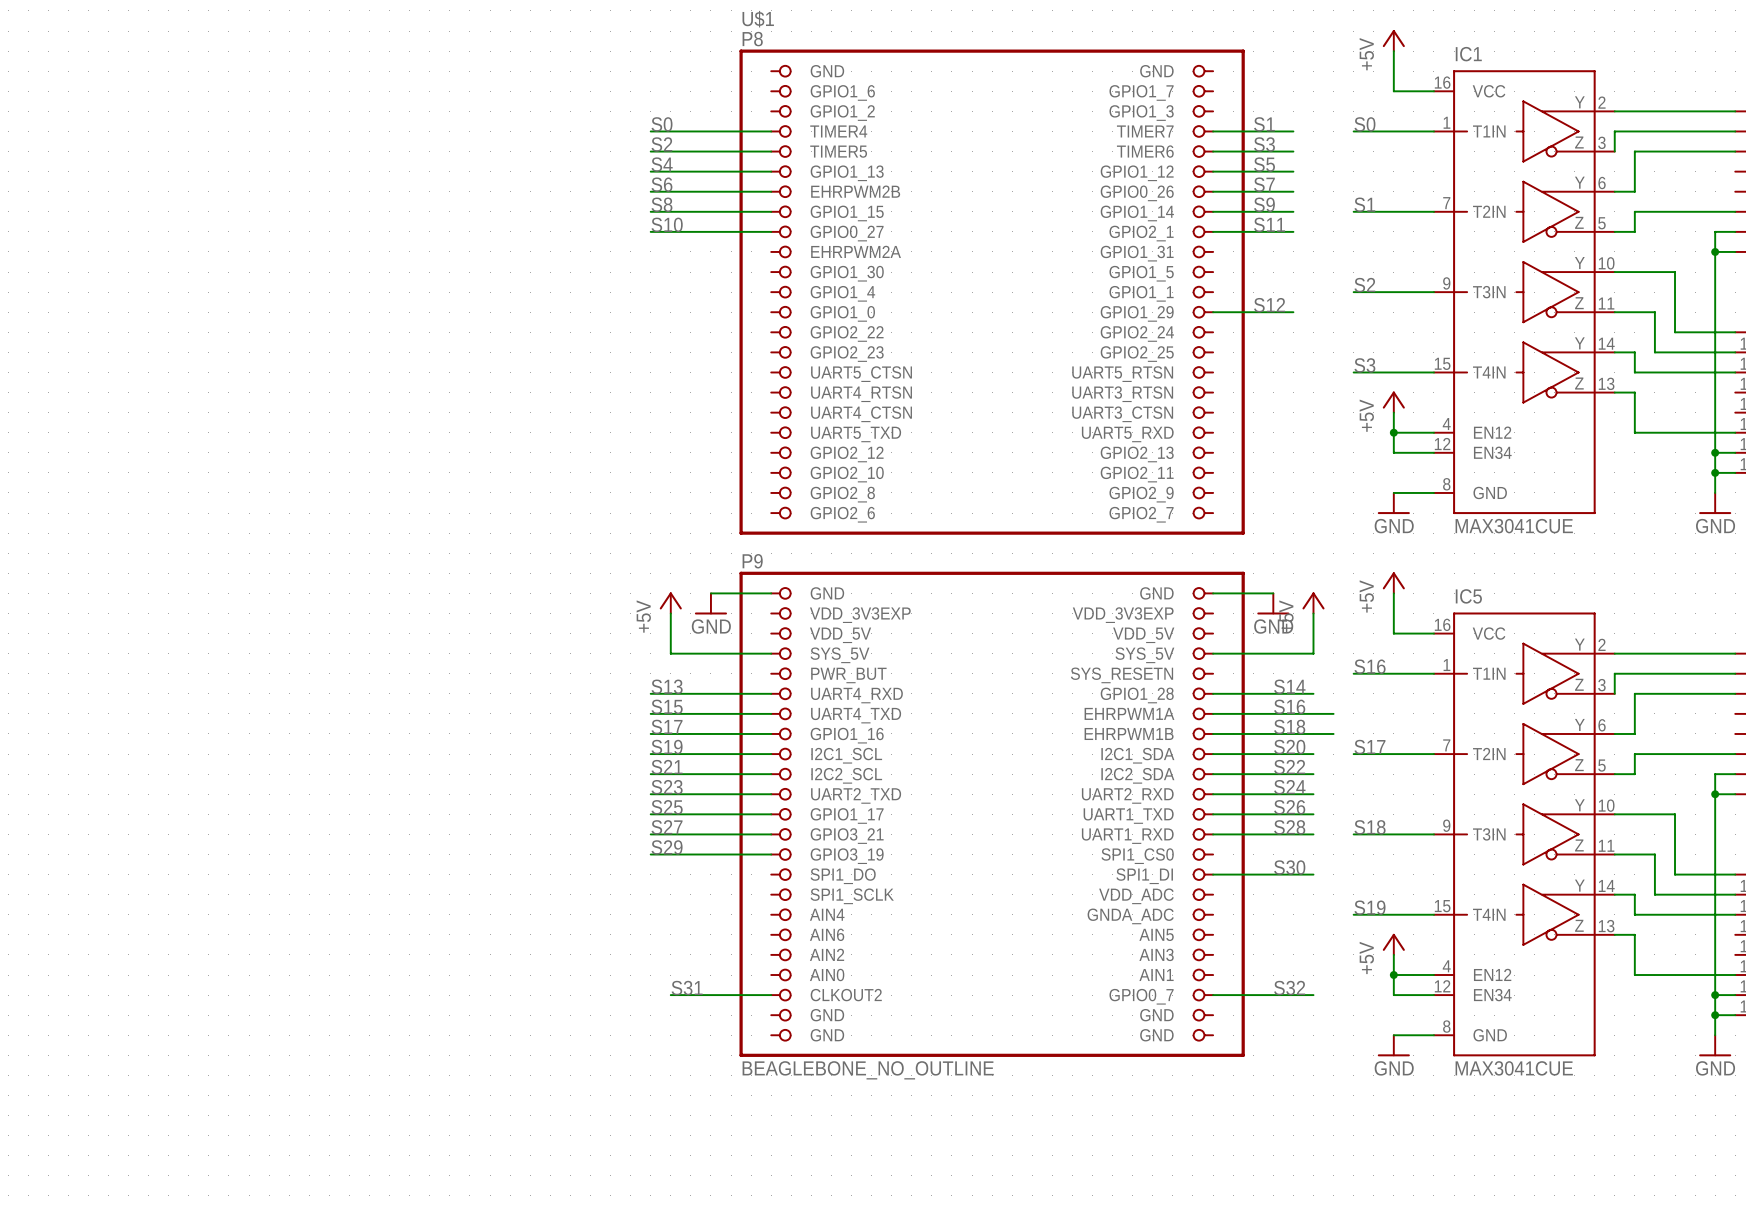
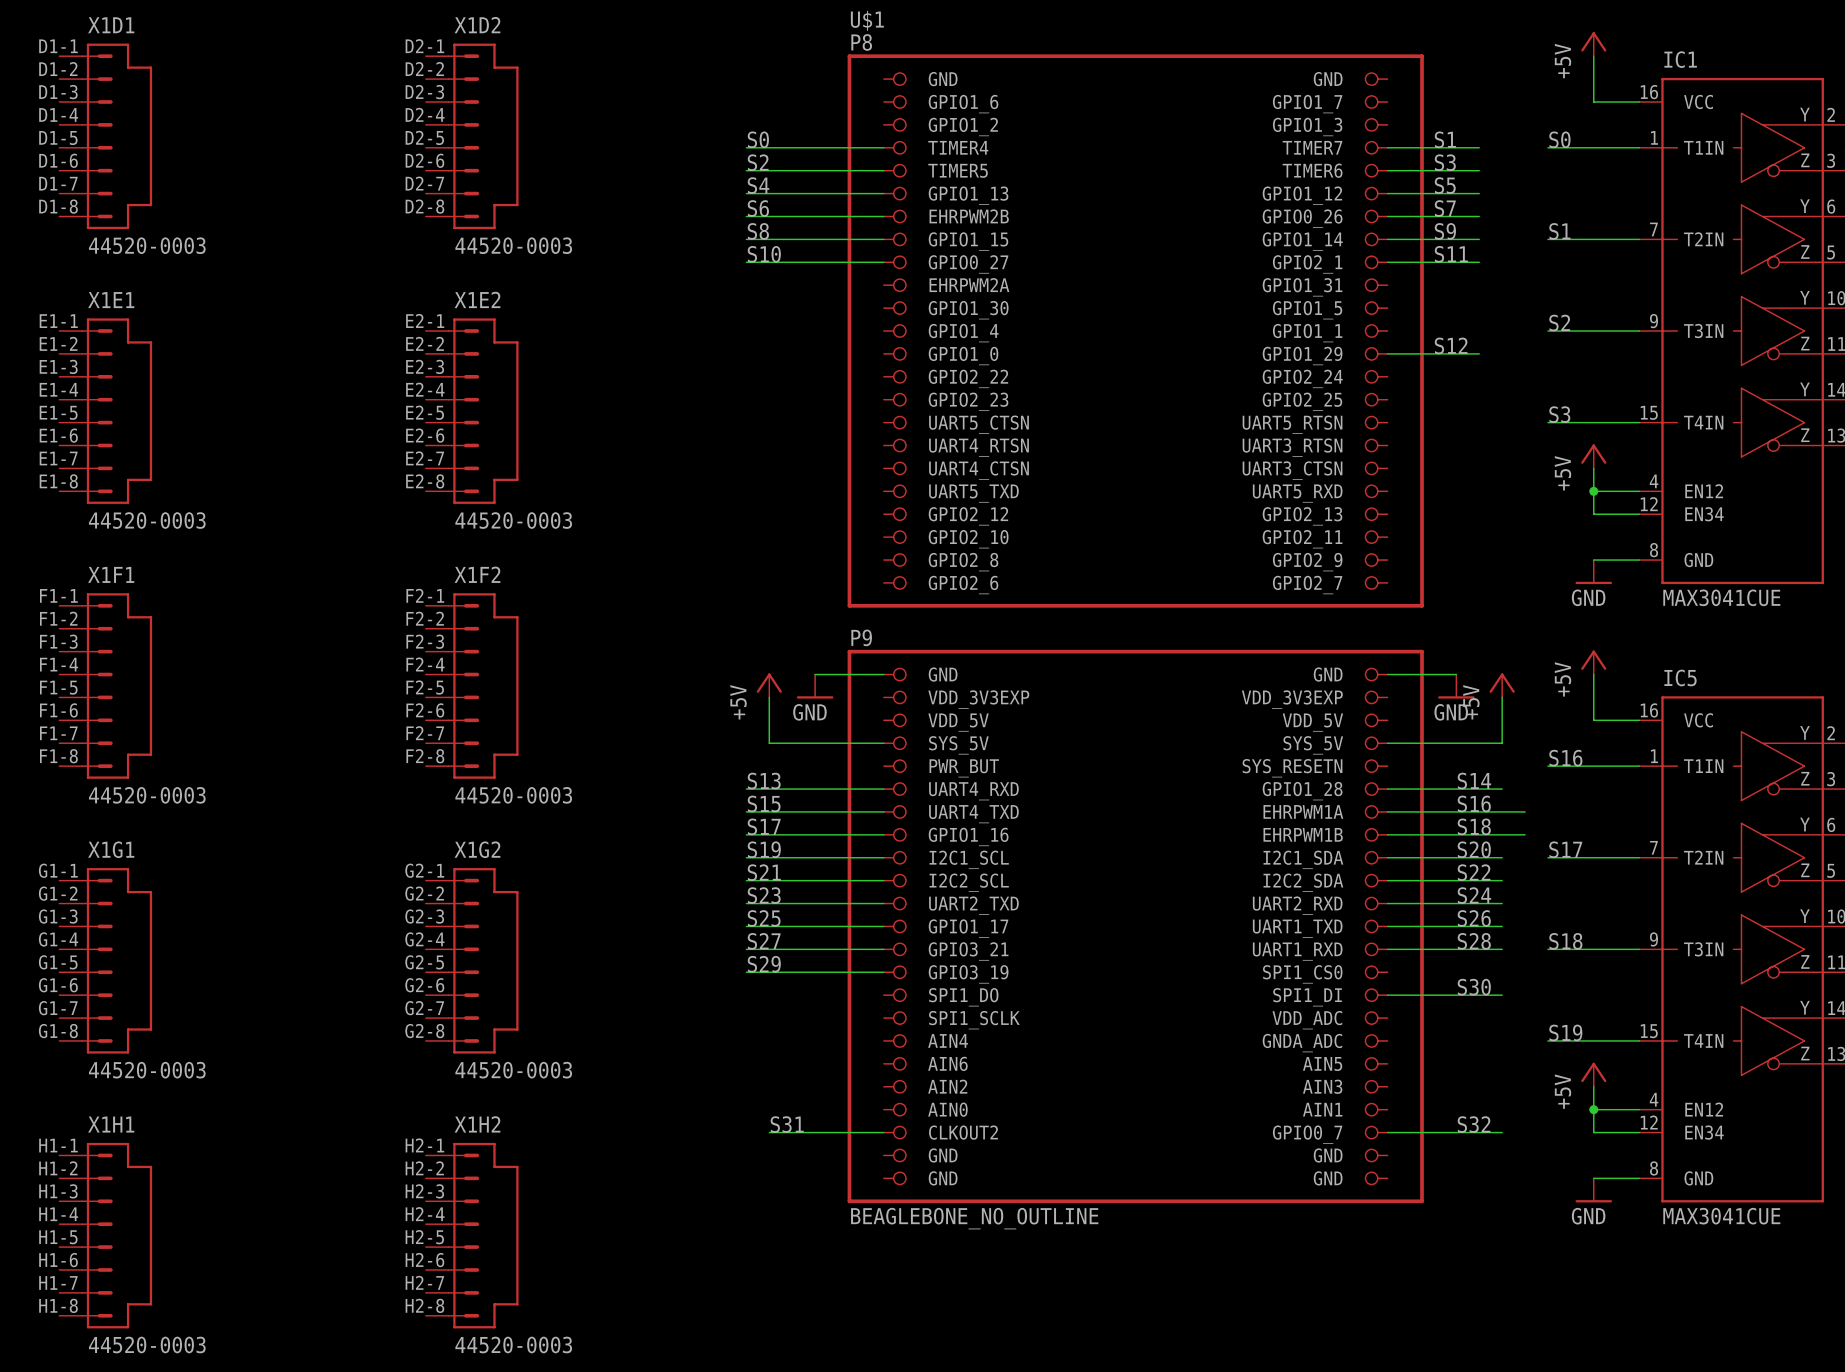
X1D1: none -> 44520-0003 (105, 136)
X1D2: none -> 44520-0003 (472, 136)
X1E1: none -> 44520-0003 (105, 411)
X1E2: none -> 44520-0003 (472, 411)
X1F1: none -> 44520-0003 (105, 685)
X1F2: none -> 44520-0003 (472, 685)
X1G1: none -> 44520-0003 (105, 960)
X1G2: none -> 44520-0003 (472, 960)
X1H1: none -> 44520-0003 (105, 1235)
X1H2: none -> 44520-0003 (472, 1235)

